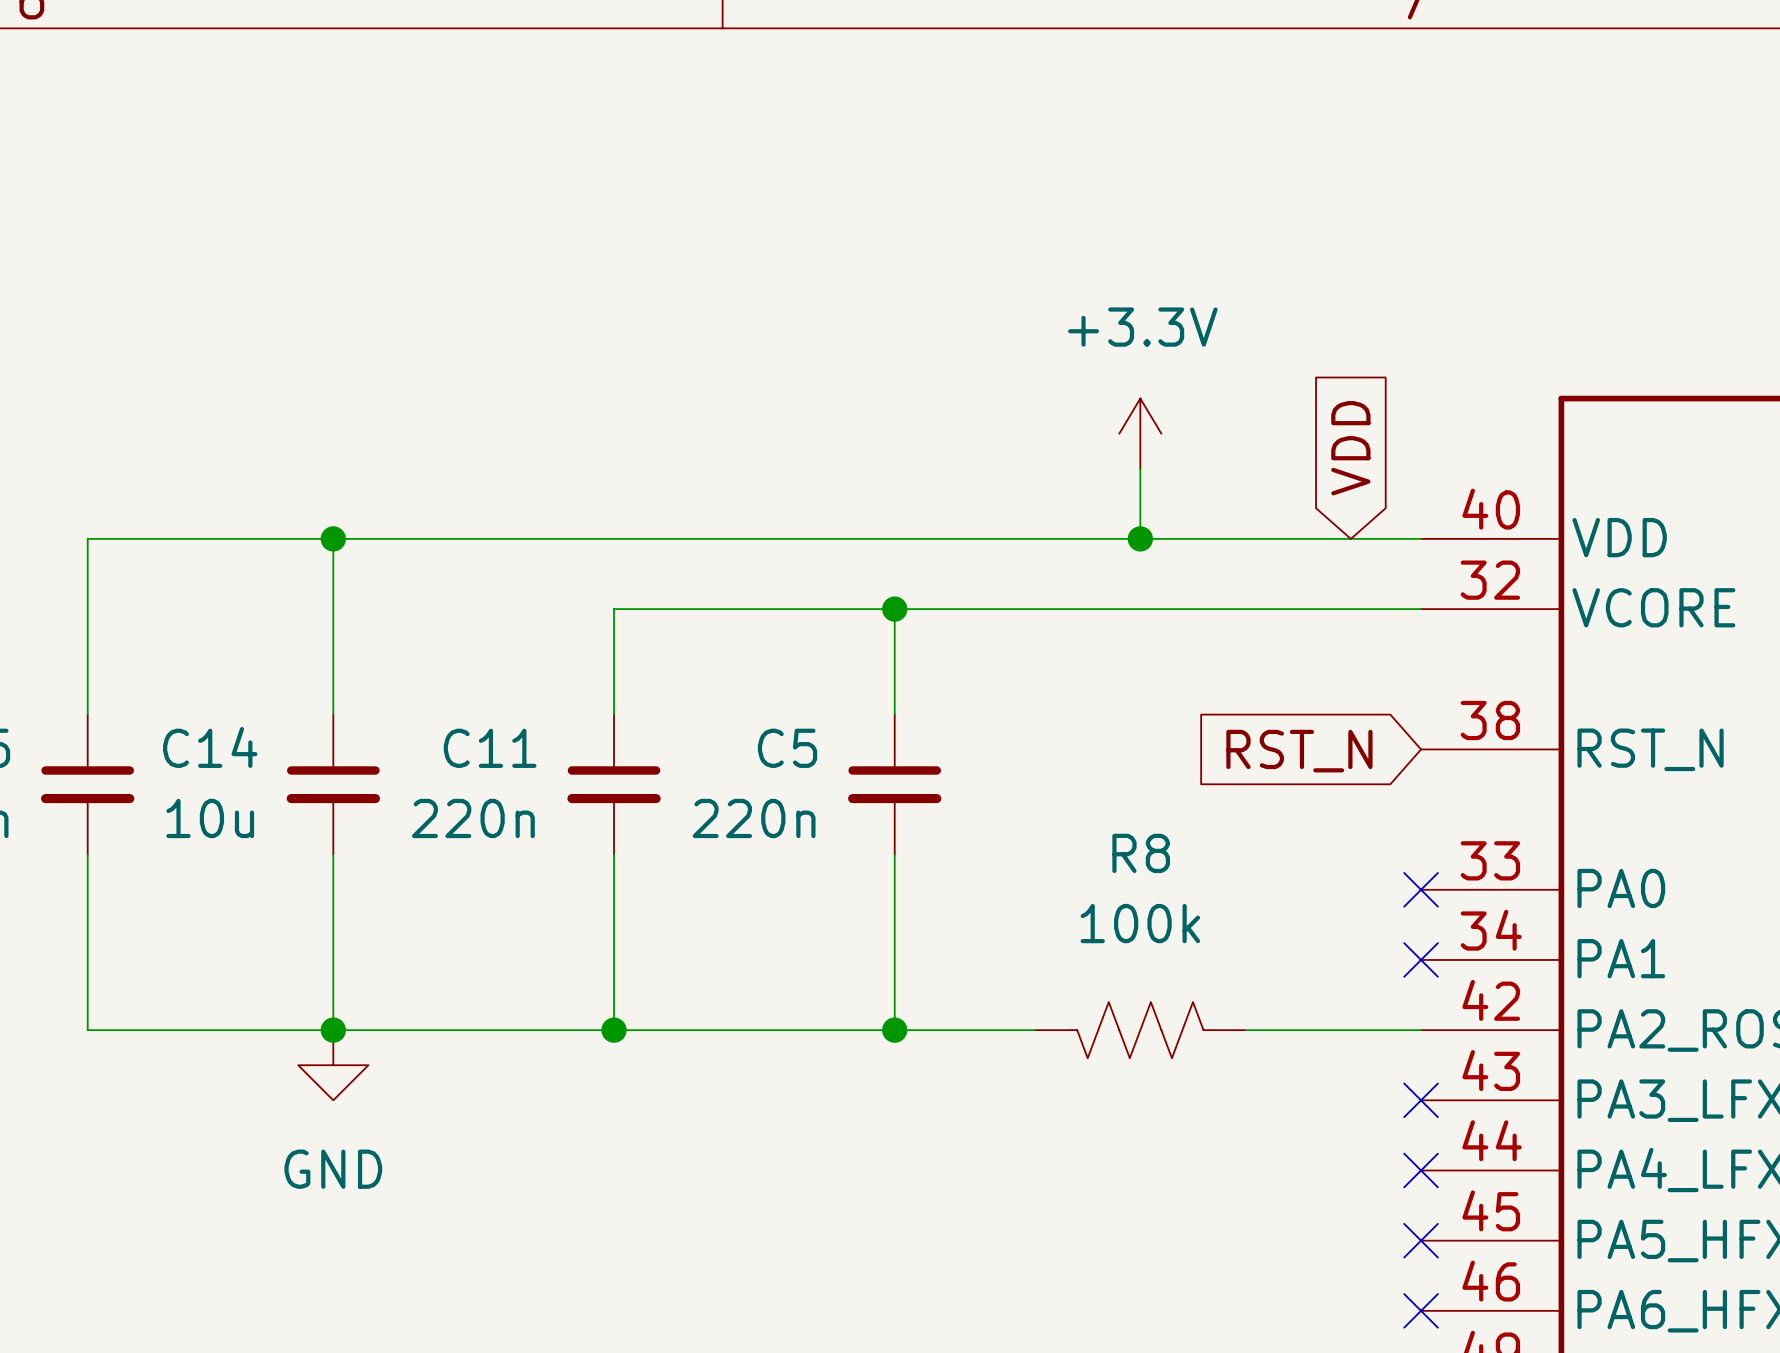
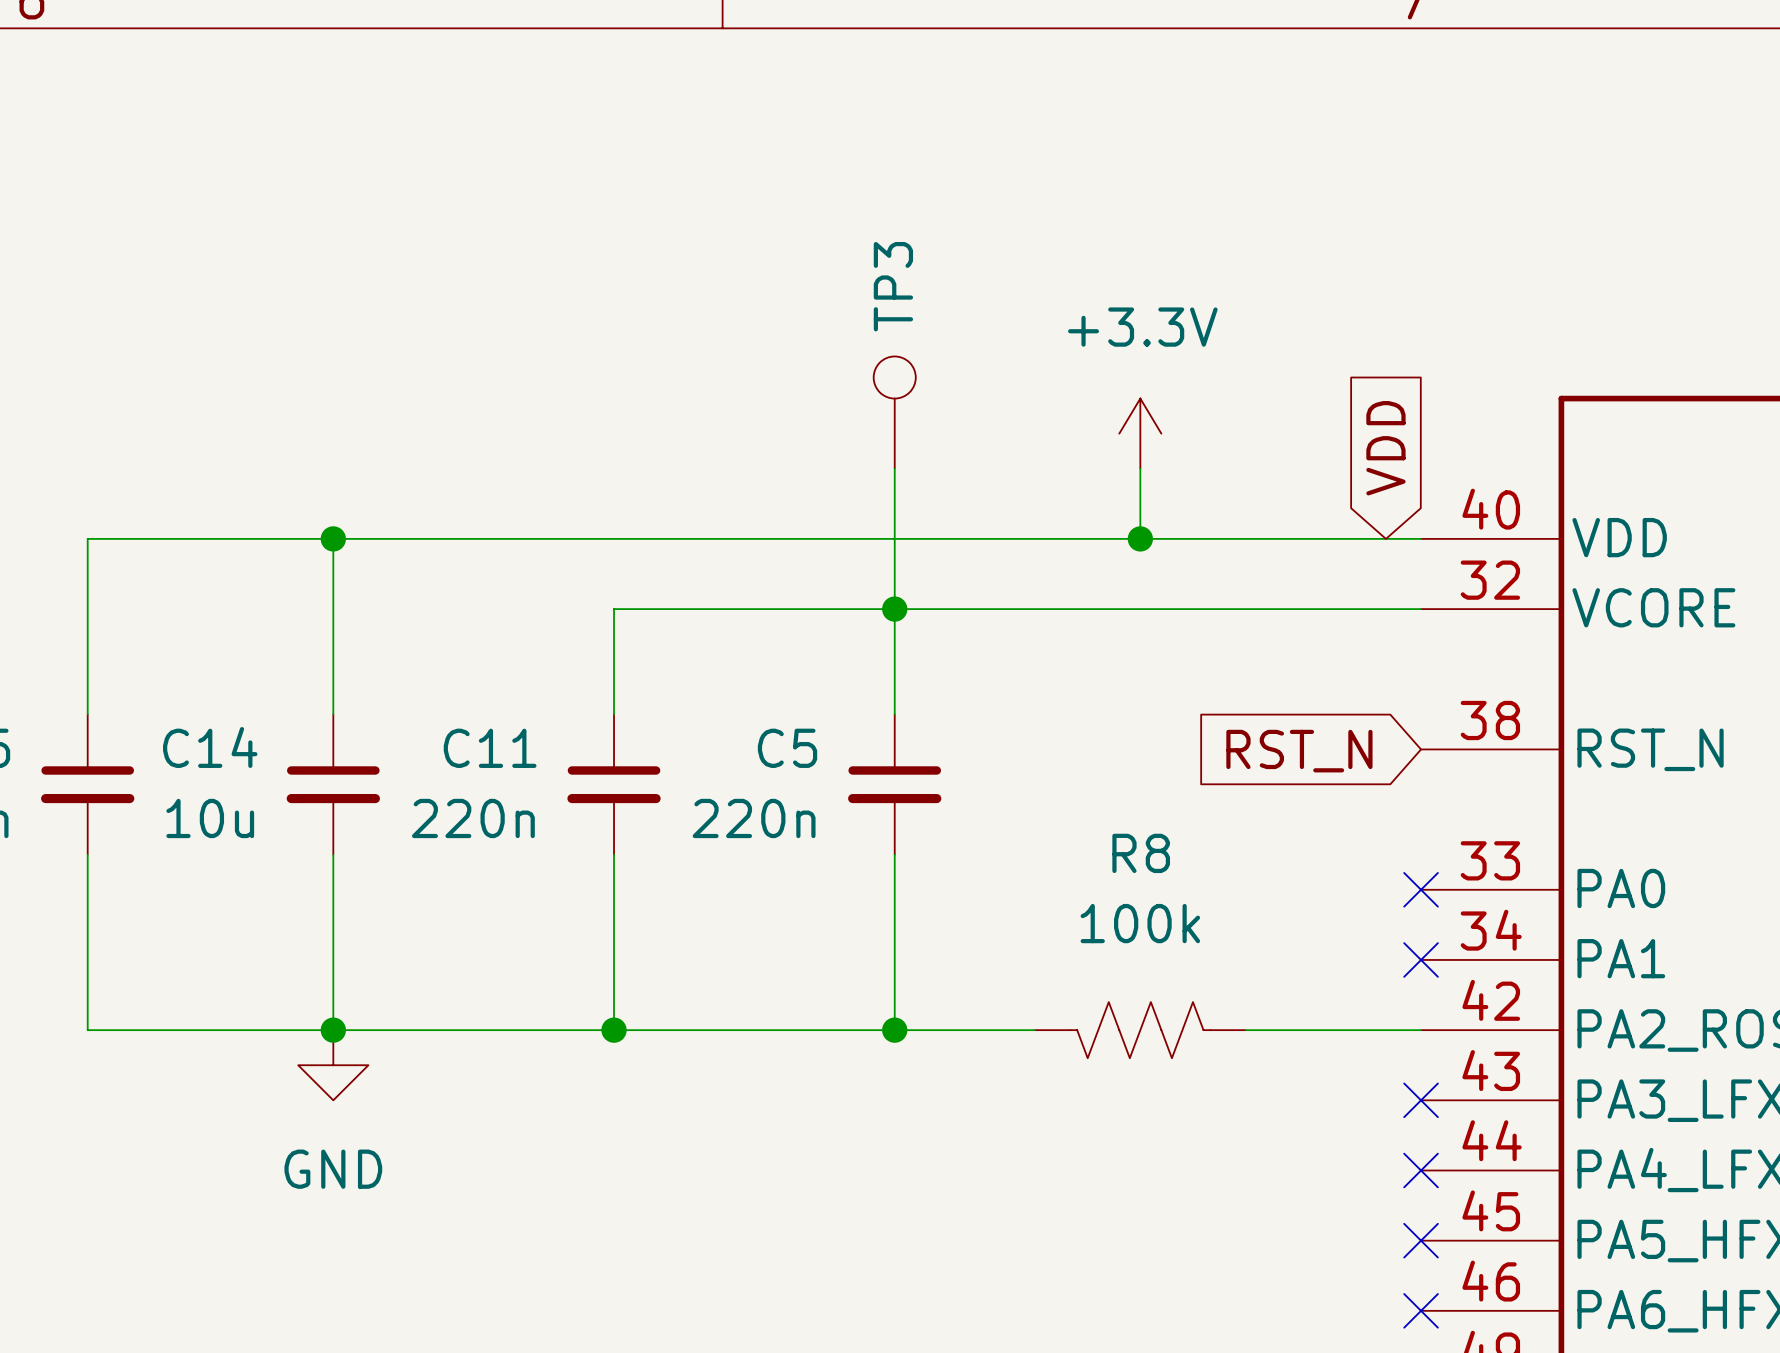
TP3: none -> (894, 412)
global label position: VDD (1350, 448) -> VDD (1385, 448)
wire: none -> (894, 468) (894, 609)

